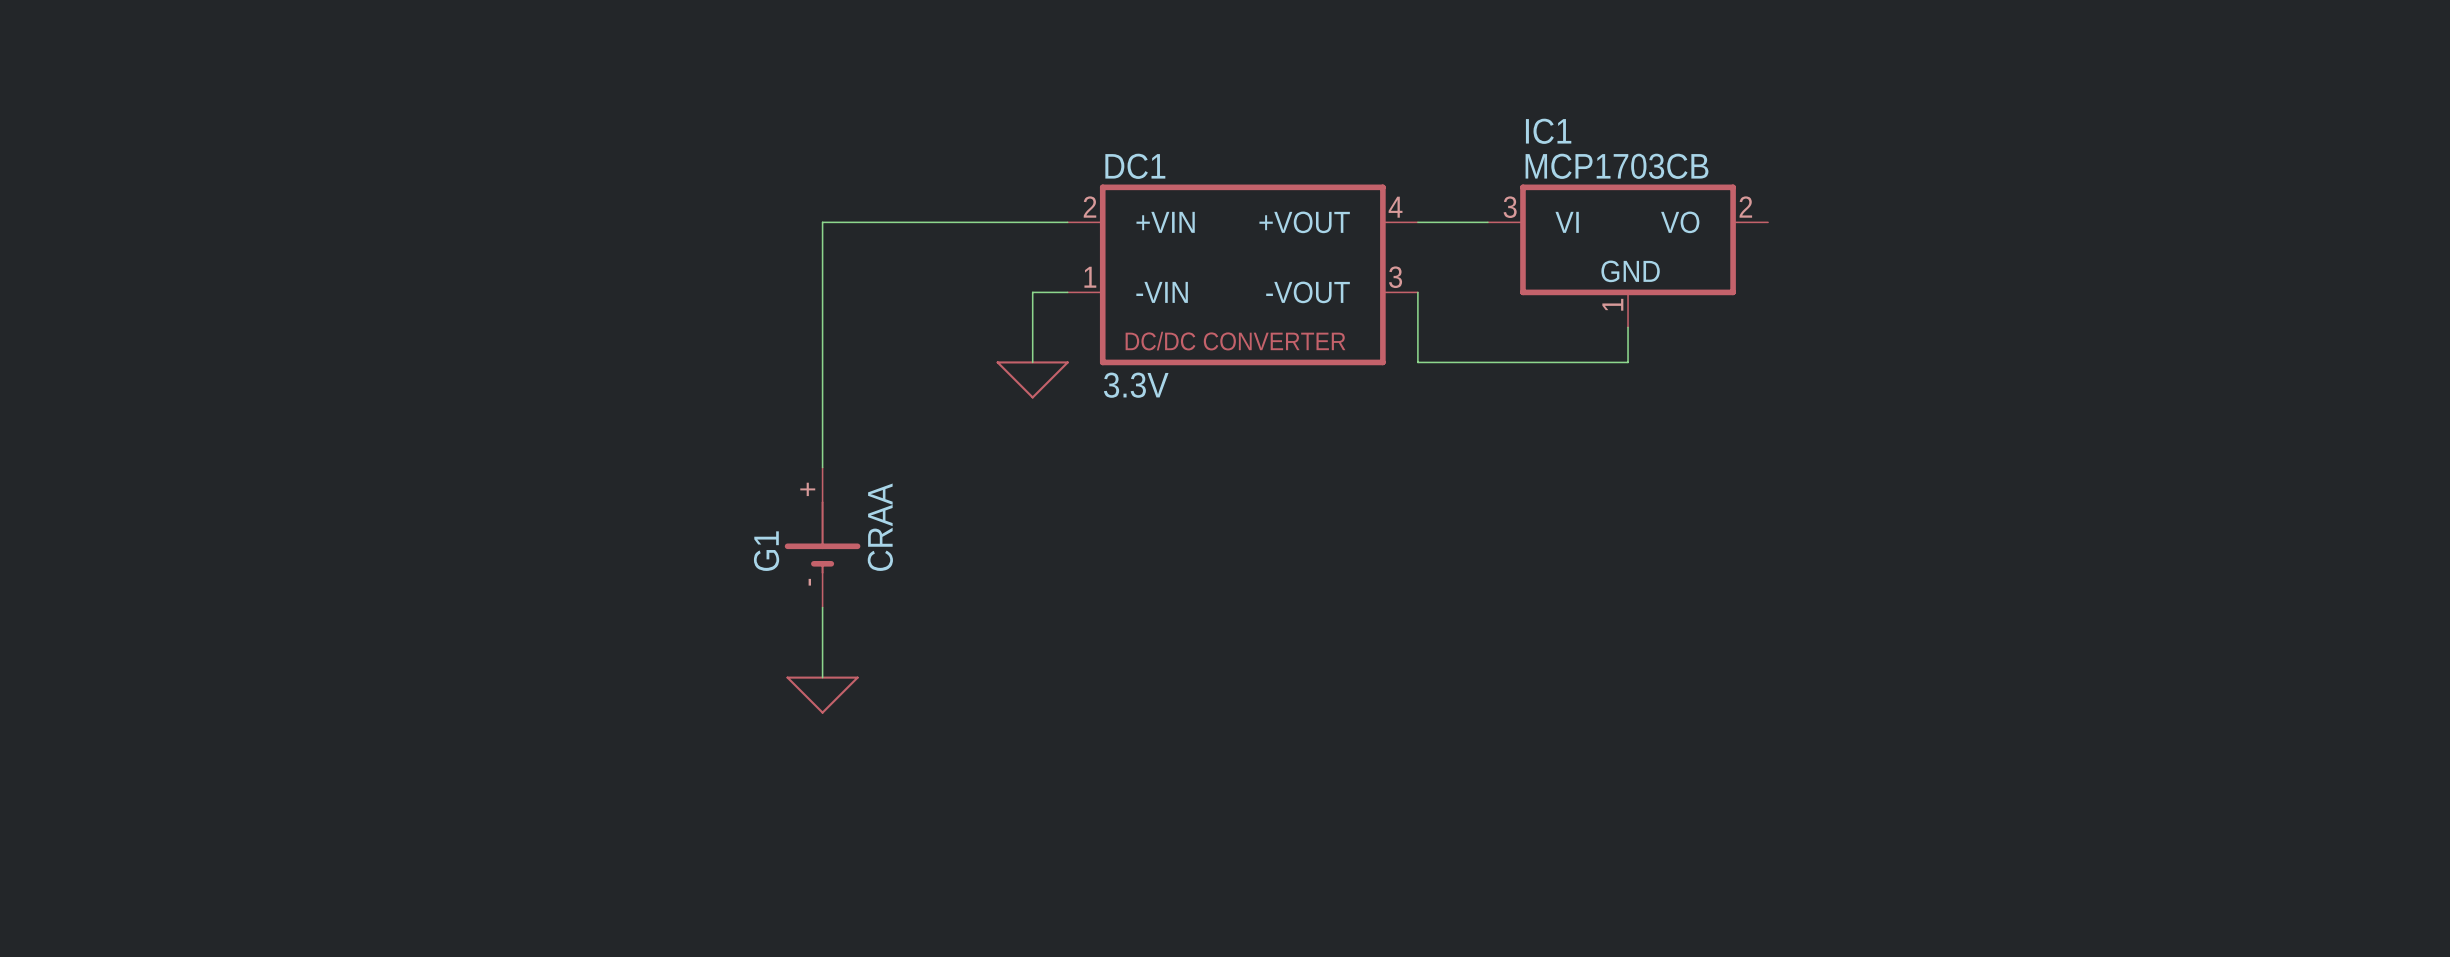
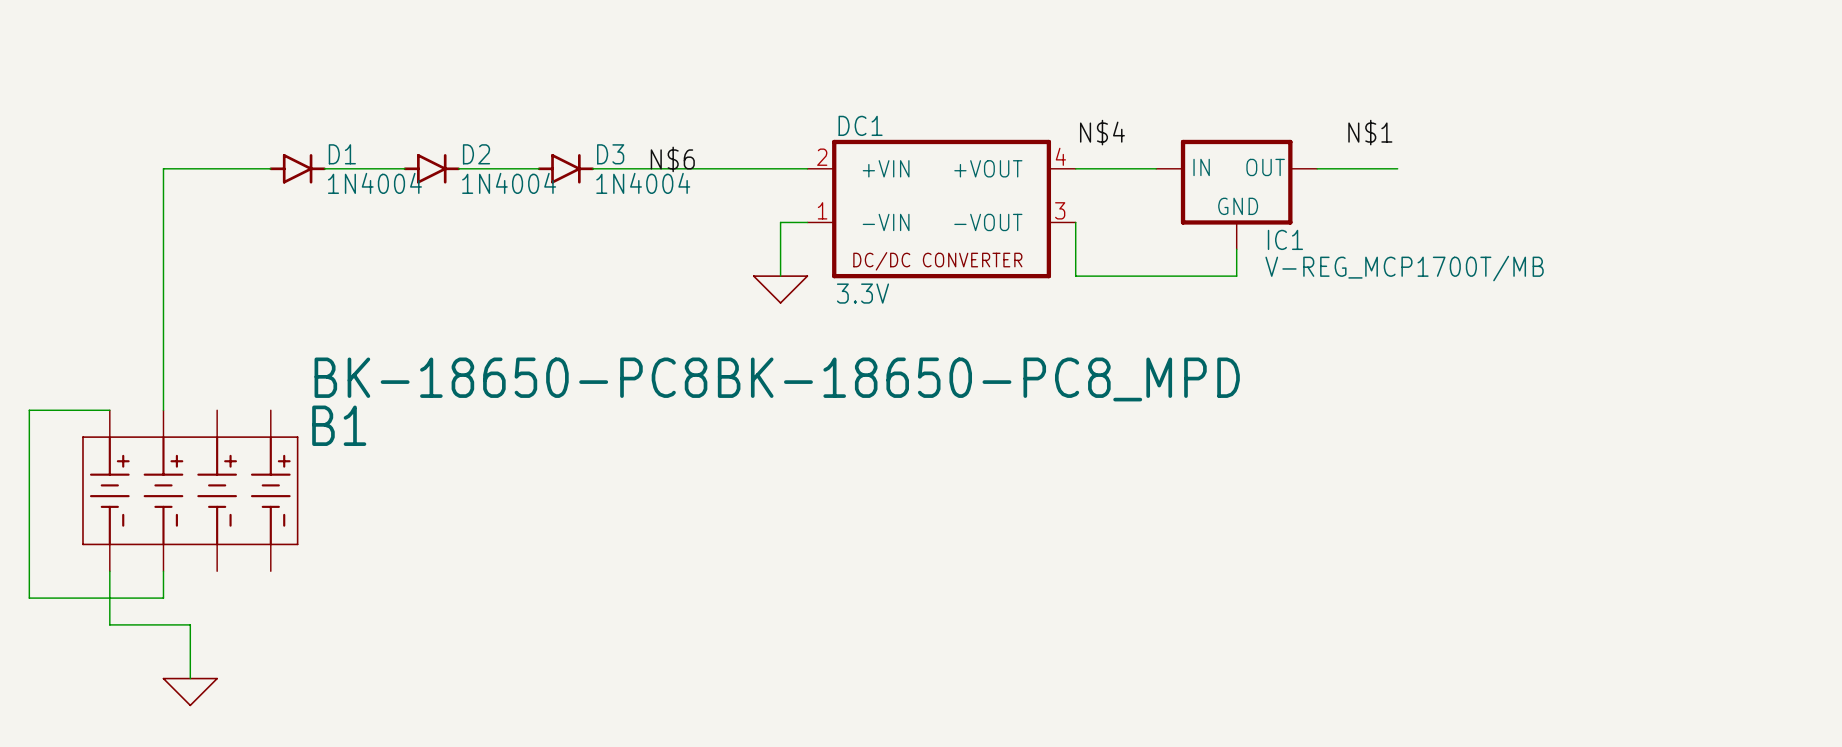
IC1 name position: IC1 (1548, 131) -> IC1 (1285, 239)
IC1 value: MCP1703CB (1617, 166) -> V-REG_MCP1700T/MB (1404, 268)
label: none -> N$4 (1102, 132)
label: none -> N$1 (1370, 132)
IC1 symbol: [1487, 184, 1769, 328] -> [1156, 139, 1318, 250]
label: none -> N$6 (672, 159)
wire: none -> (270, 168) (163, 168) (163, 410)
D1: none -> 1N4004 (297, 168)
wire: none -> (324, 168) (404, 168)
D2: none -> 1N4004 (431, 168)
wire: none -> (458, 168) (539, 168)
D3: none -> 1N4004 (565, 168)
wire: (822, 222) (822, 467) -> (619, 168) (592, 168)
wire: none -> (1317, 168) (1397, 168)
wire: none -> (109, 410) (29, 410) (29, 598) (163, 598) (163, 571)
G1: CRAA (822, 537) -> none
wire: (822, 607) (822, 677) -> none
B1: none -> BK-18650-PC8BK-18650-PC8_MPD (190, 490)
power symbol: (822, 695) -> none
wire: none -> (109, 571) (109, 624) (190, 624) (190, 678)
power symbol: none -> (190, 691)

